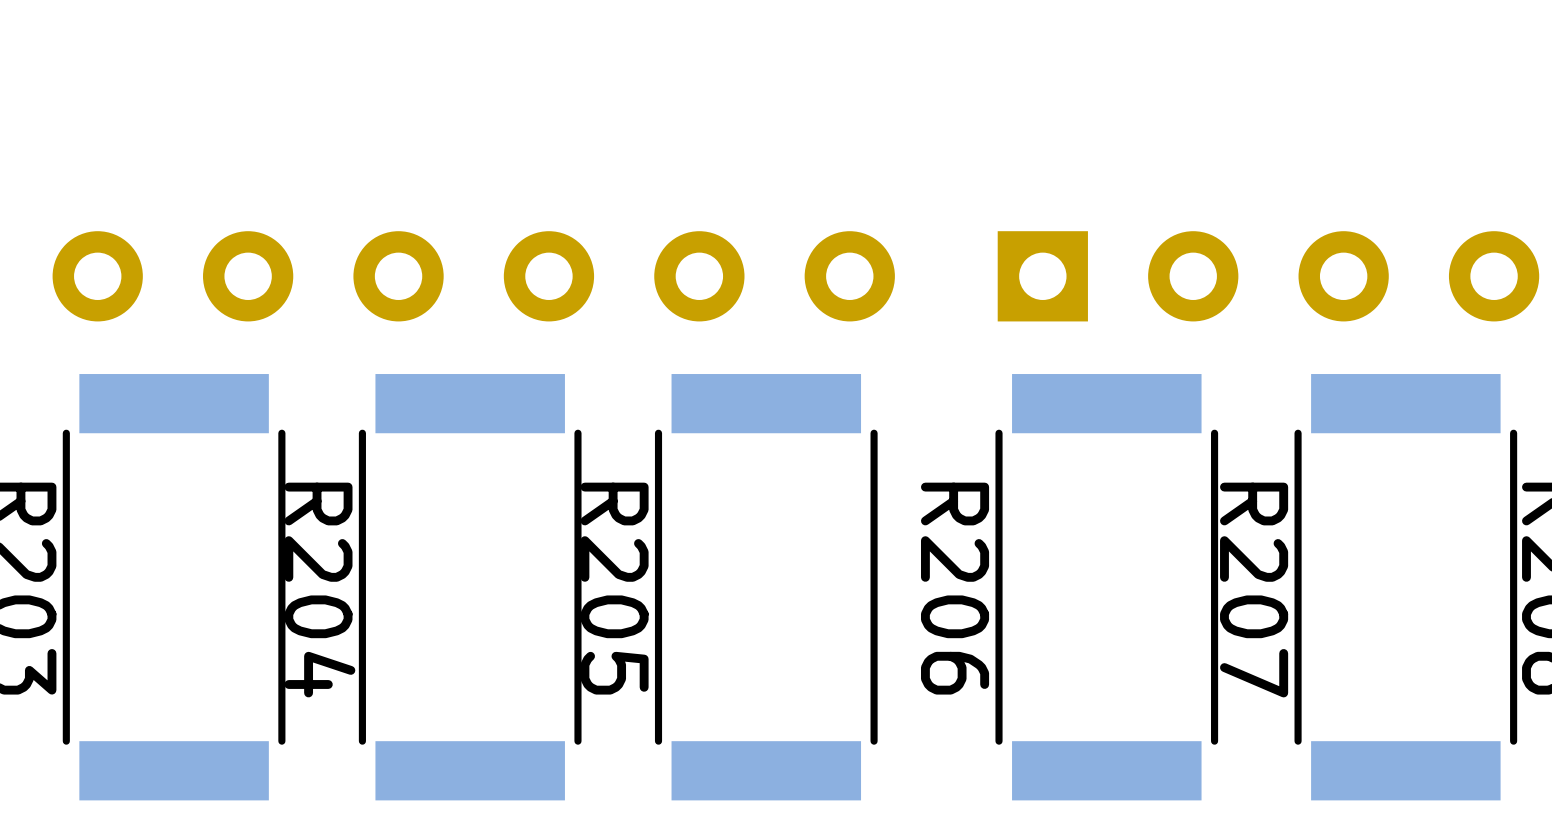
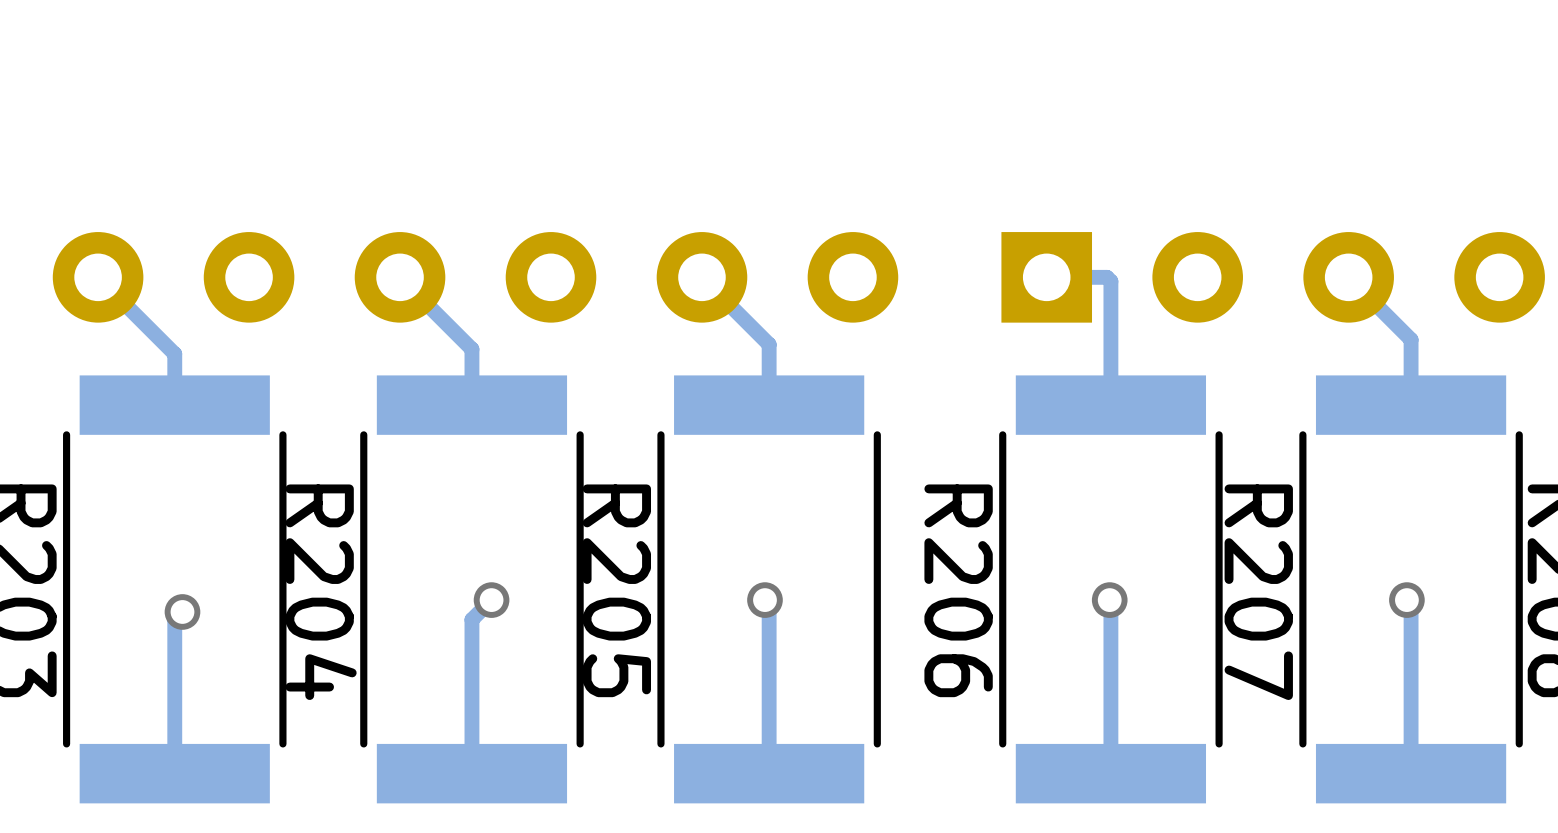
track: none -> (98, 277) (174, 354) (174, 405)
track: none -> (400, 277) (471, 349) (471, 405)
track: none -> (701, 277) (769, 344) (769, 405)
track: none -> (1046, 277) (1106, 277) (1110, 281) (1110, 405)
track: none -> (1348, 277) (1411, 339) (1411, 405)
track: none -> (491, 600) (471, 619) (471, 773)
via: none -> (491, 600)
track: none -> (764, 600) (769, 604) (769, 773)
via: none -> (764, 600)
track: none -> (1109, 600) (1110, 773)
via: none -> (1109, 600)
track: none -> (1406, 600) (1411, 604) (1411, 773)
via: none -> (1406, 600)
track: none -> (182, 611) (174, 619) (174, 773)
via: none -> (182, 611)

